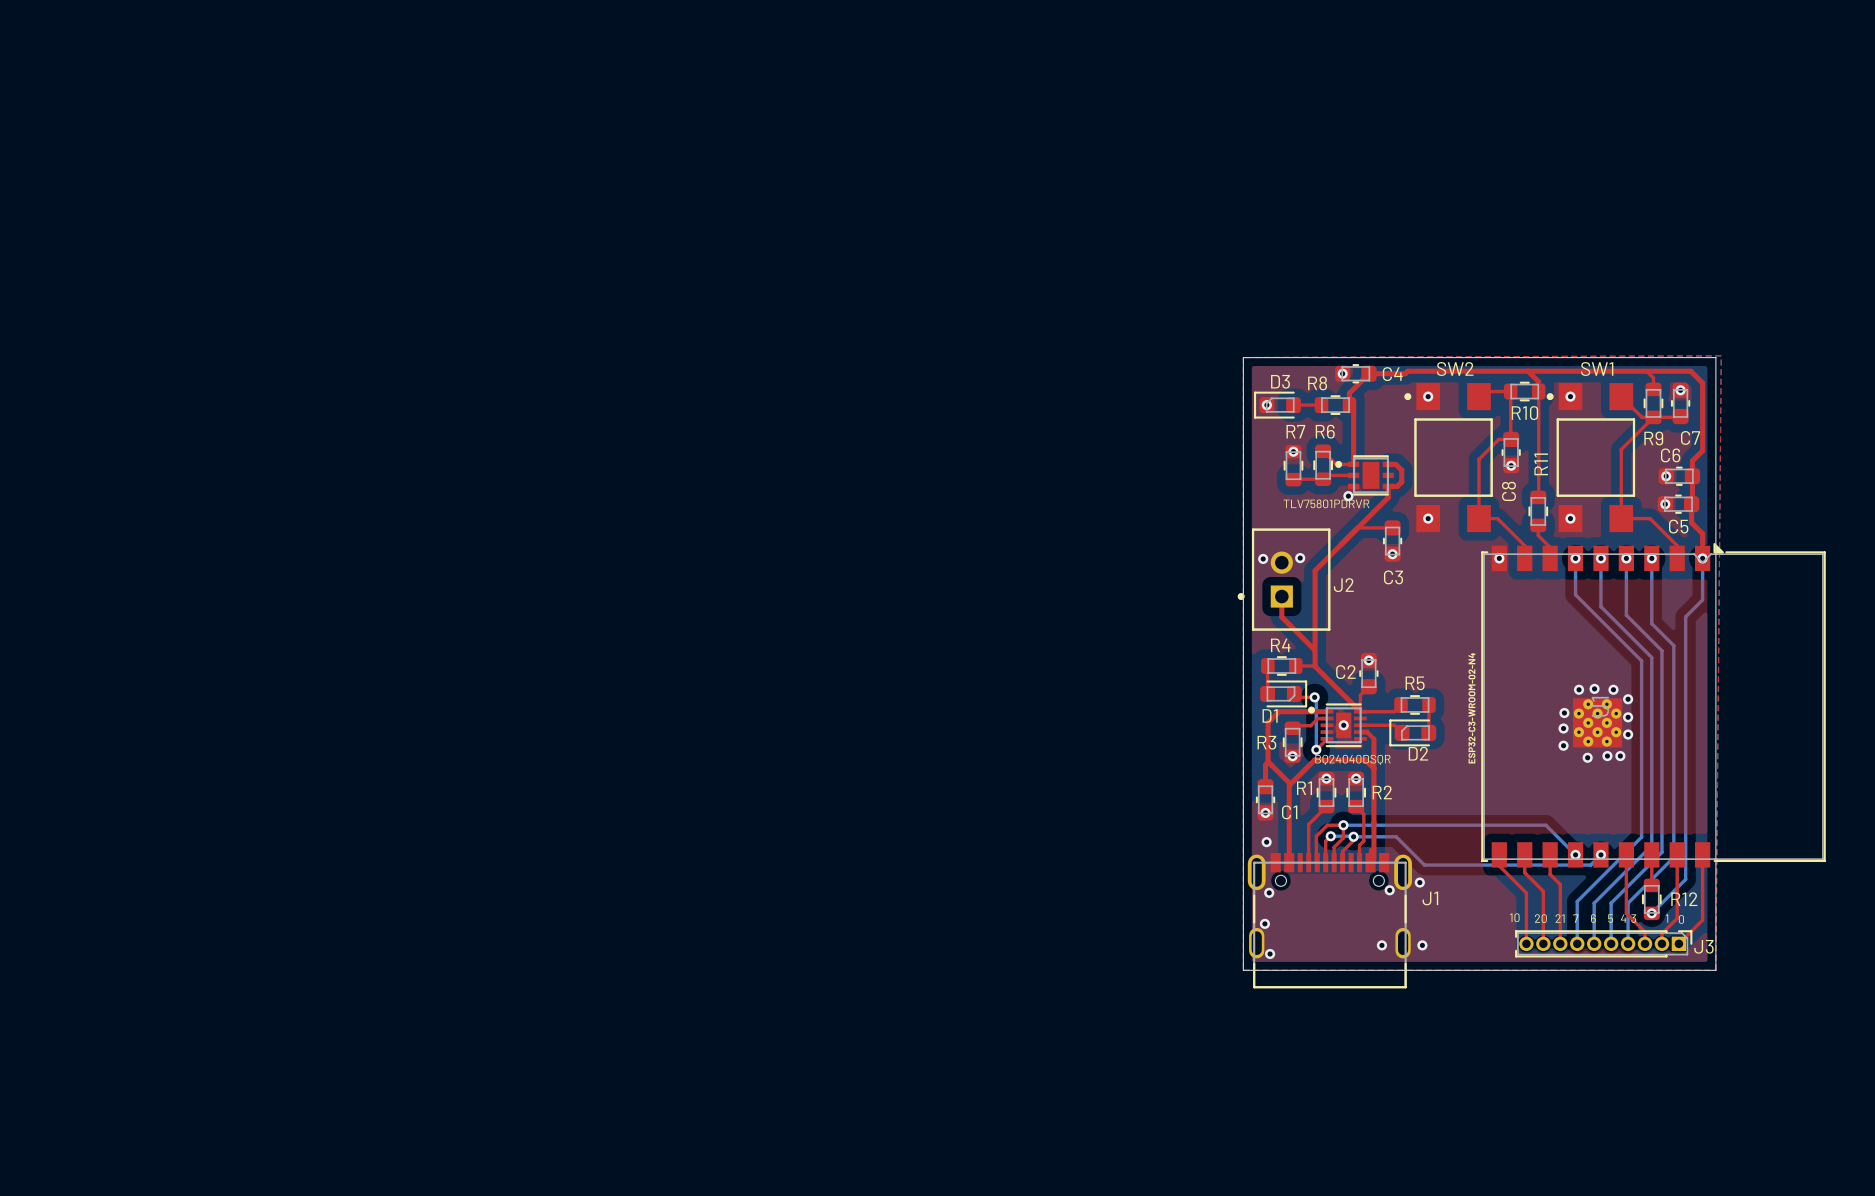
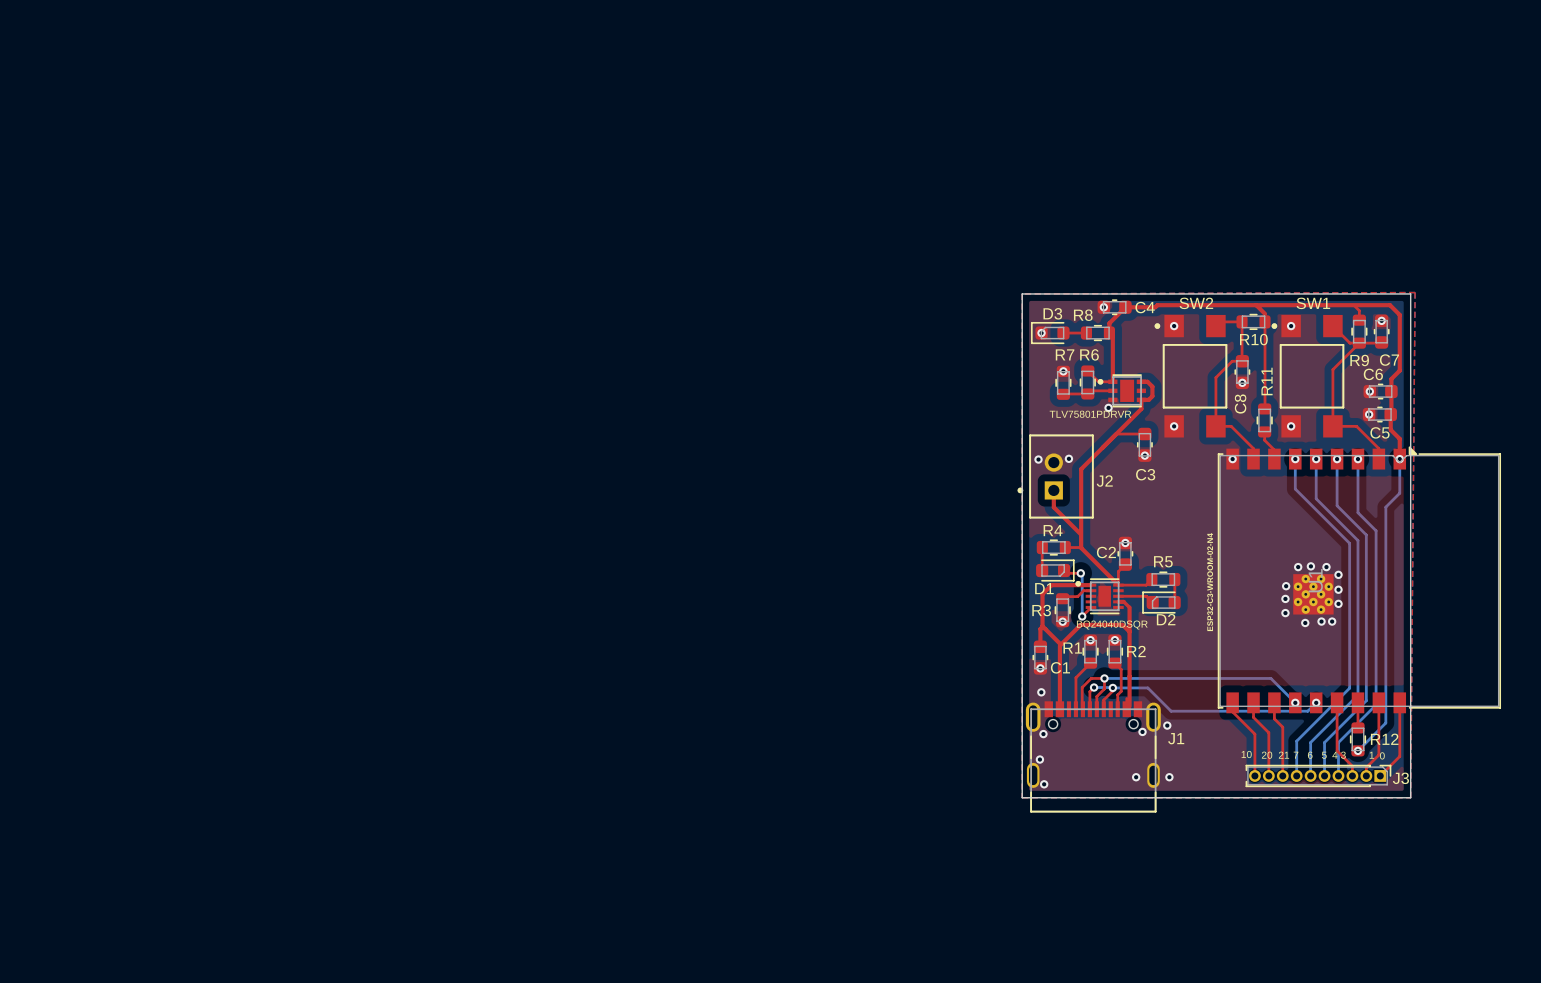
via: (1343, 725) -> none

